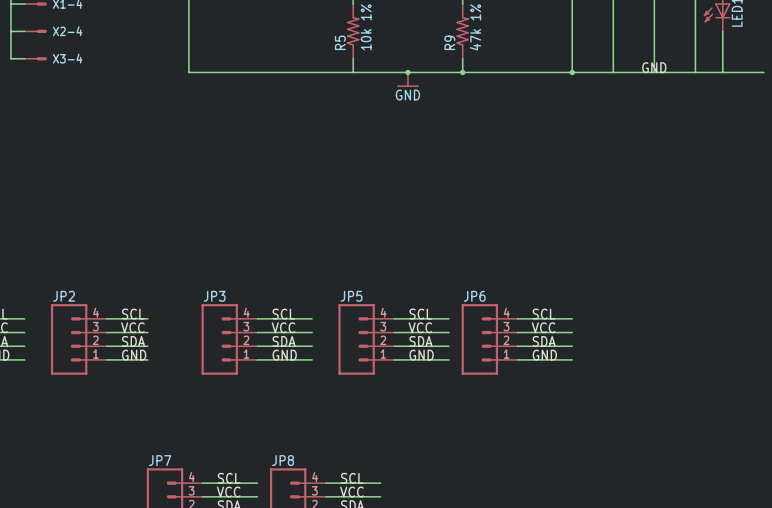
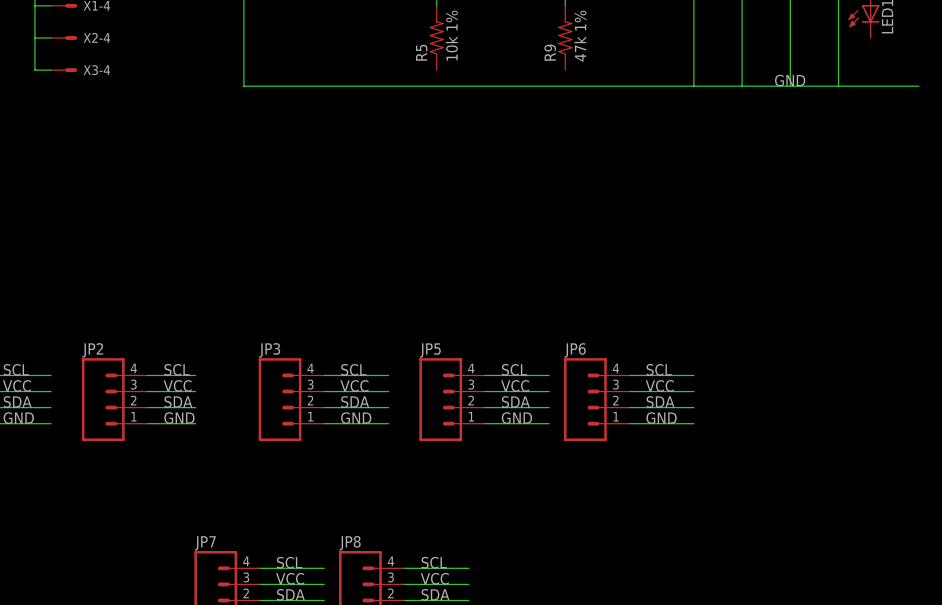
wire: (722, 31) (722, 72) -> none
wire: (353, 58) (353, 72) -> none
wire: (462, 58) (462, 72) -> none
junction: (407, 72) -> none
junction: (462, 72) -> none
junction: (572, 72) -> none
power symbol: GND (407, 79) -> none

